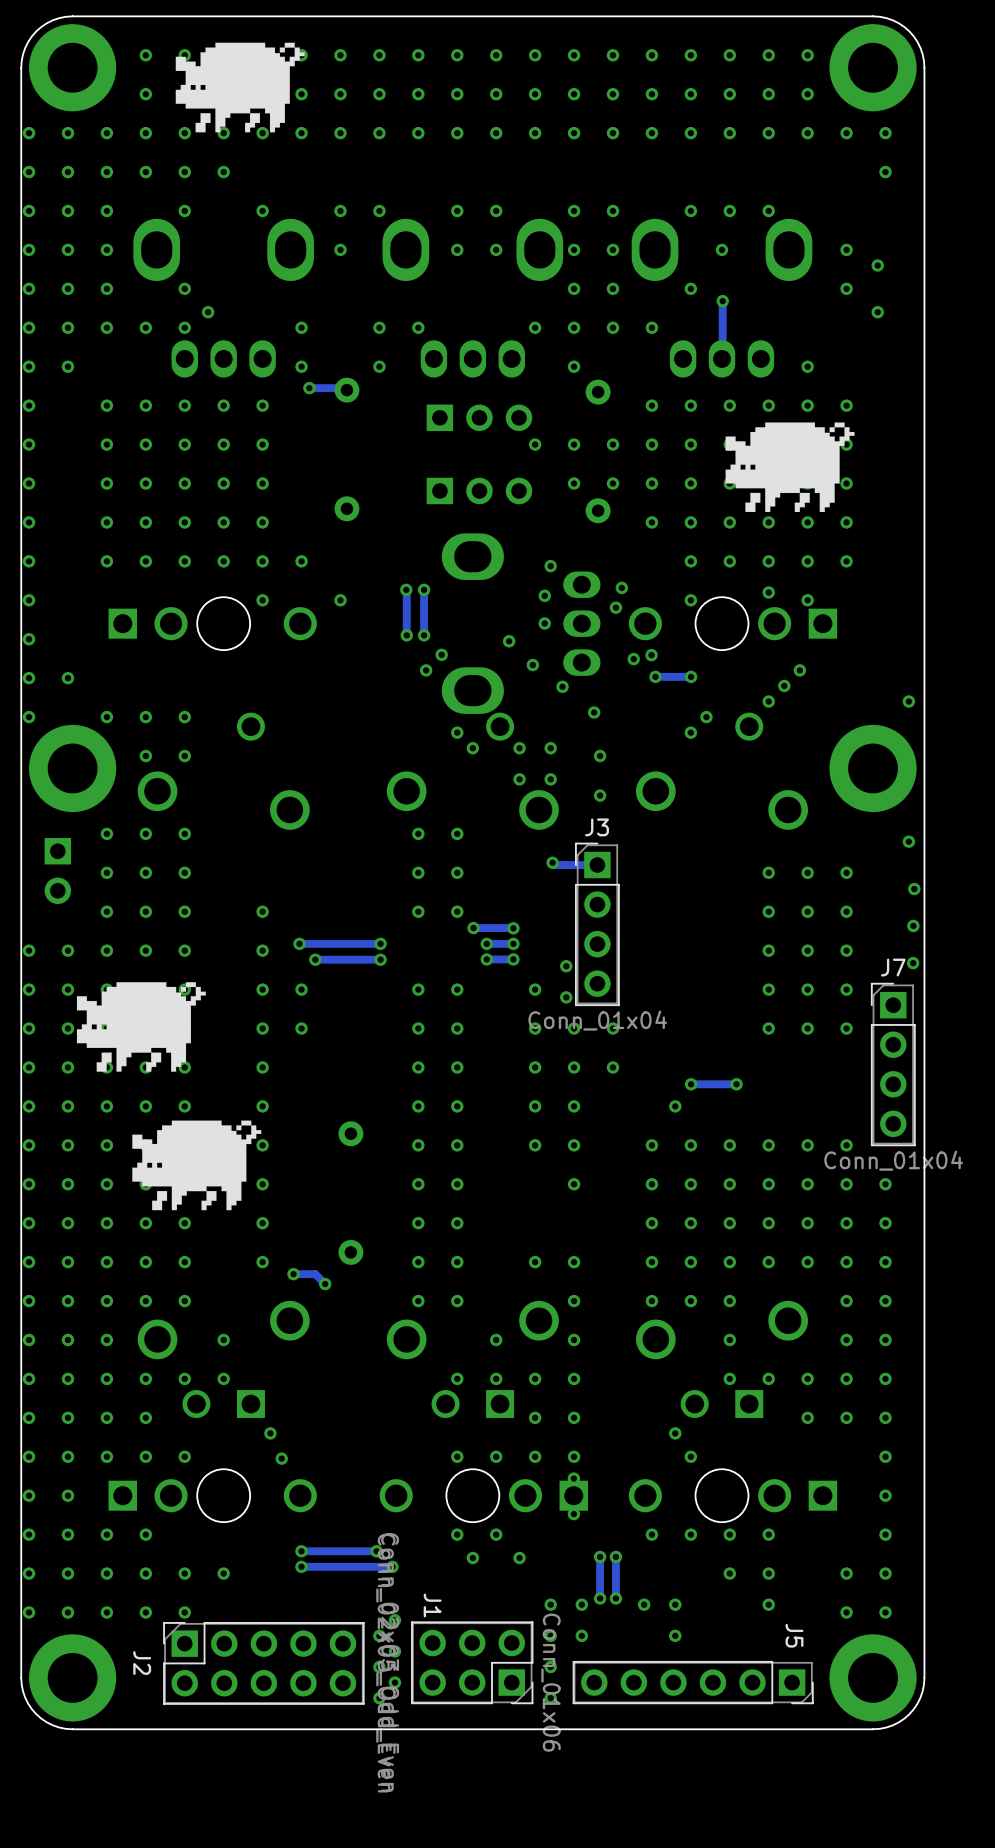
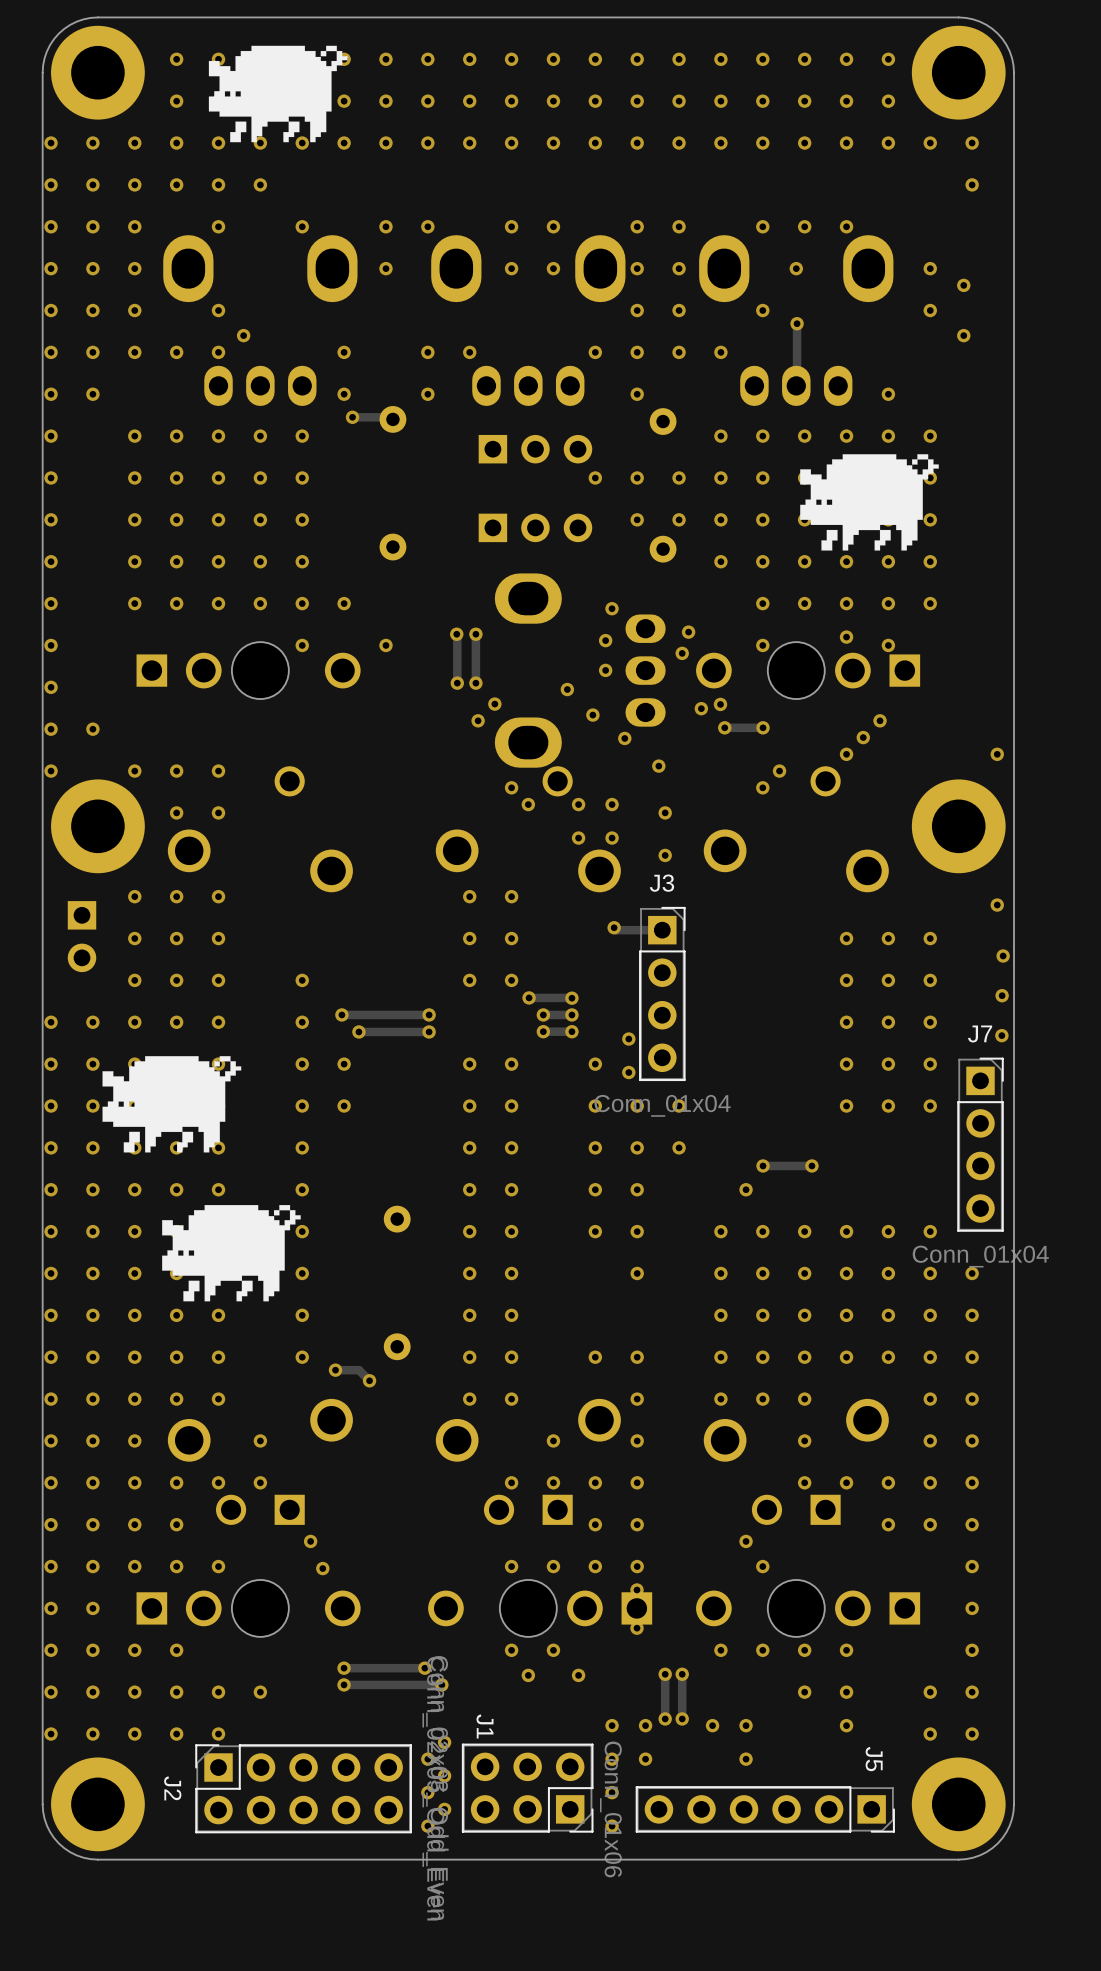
J3 footprint: [574, 842, 620, 1007] -> [639, 906, 686, 1082]
J7 footprint: [870, 982, 916, 1147] -> [957, 1057, 1004, 1232]

